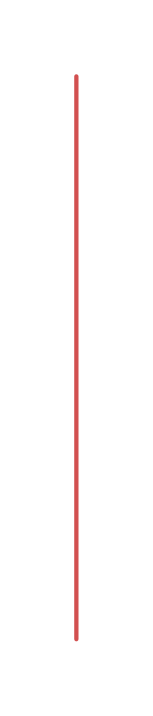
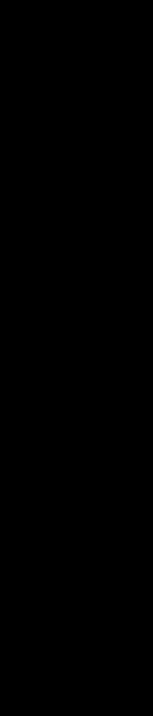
track: (76, 76) (76, 639) -> none

